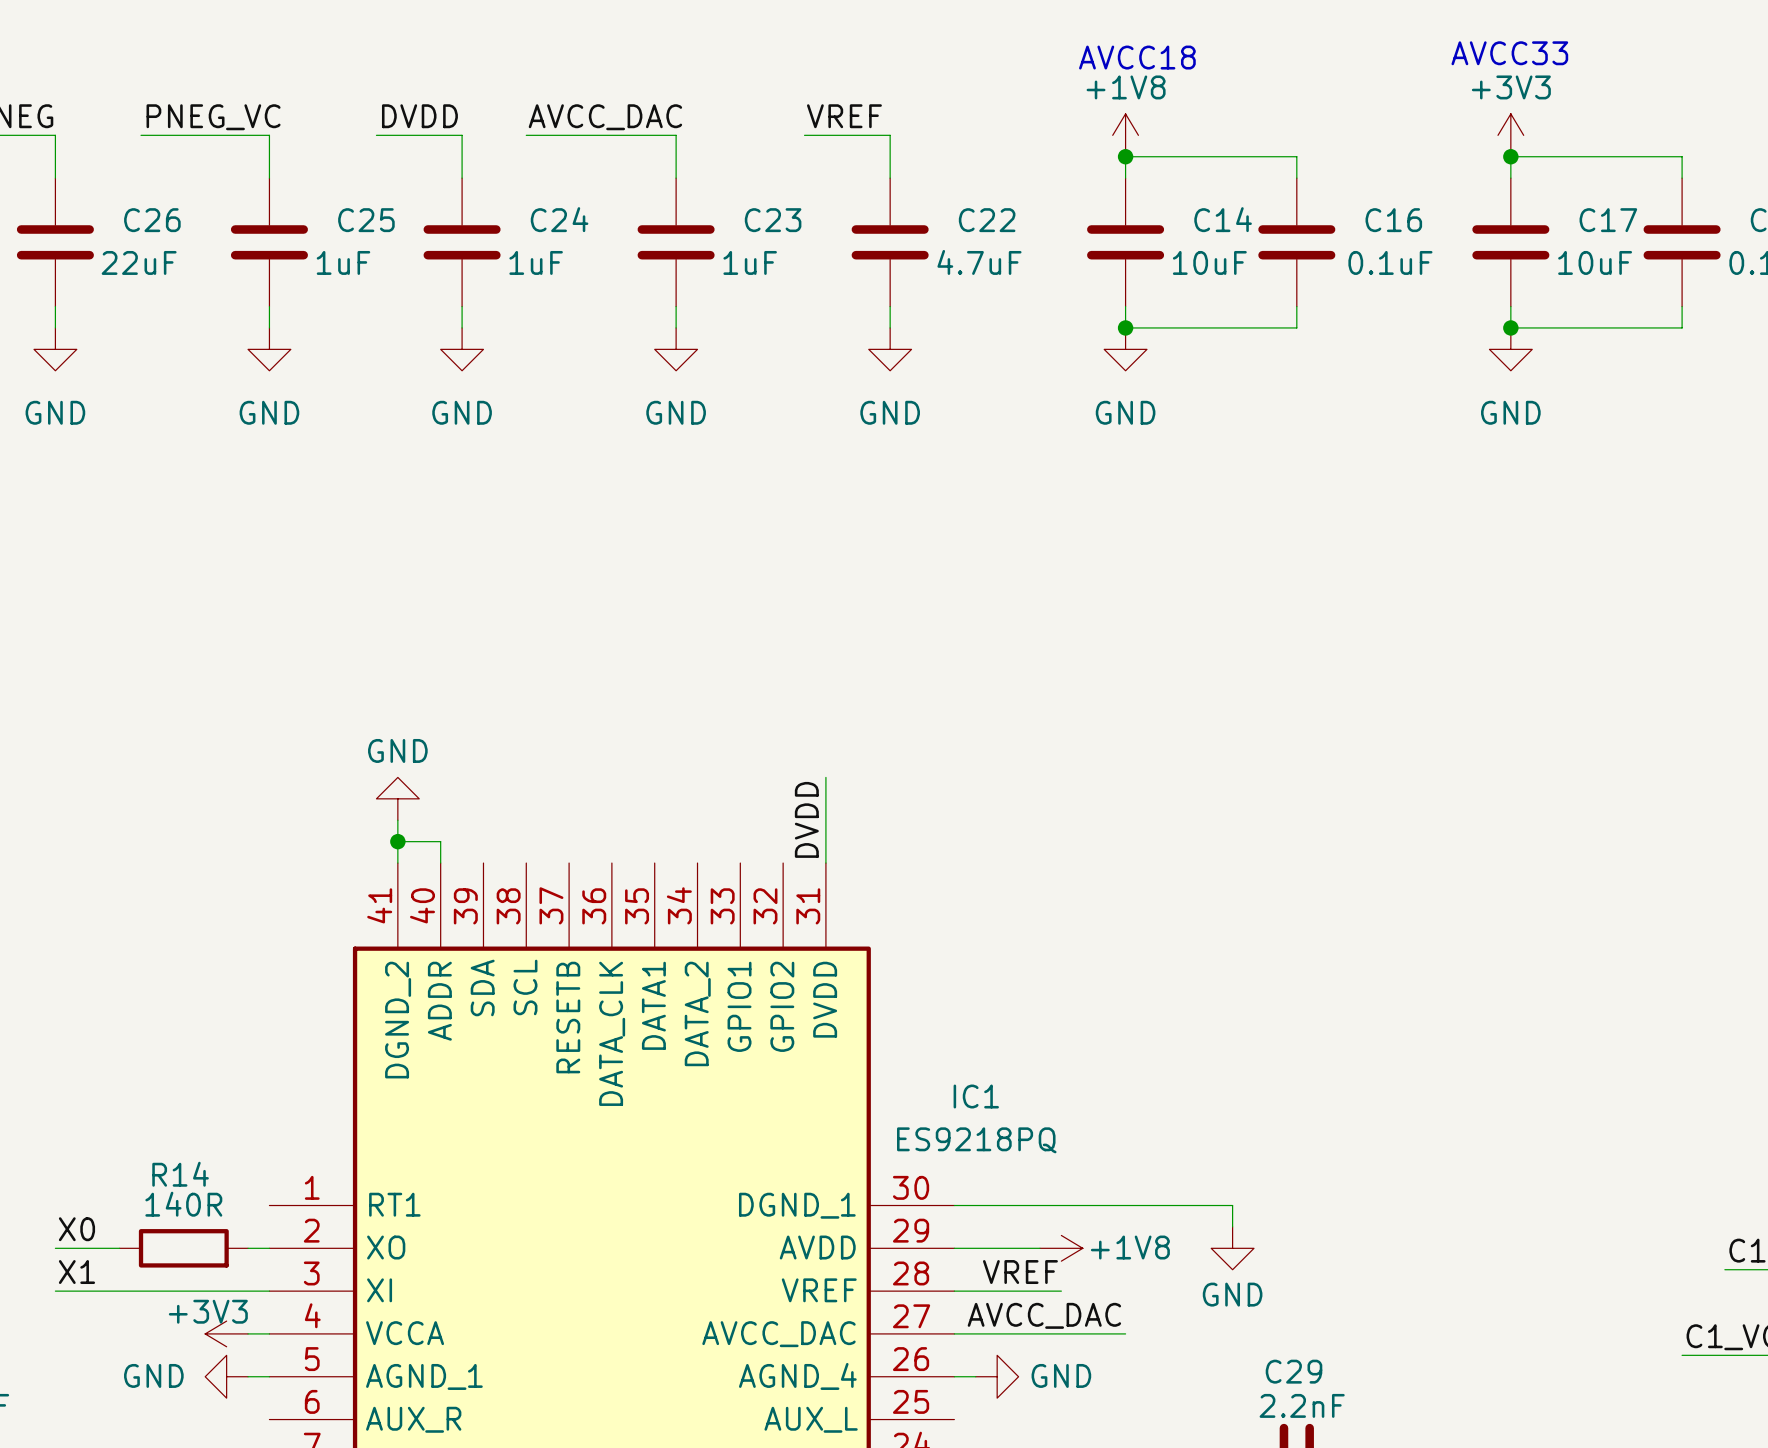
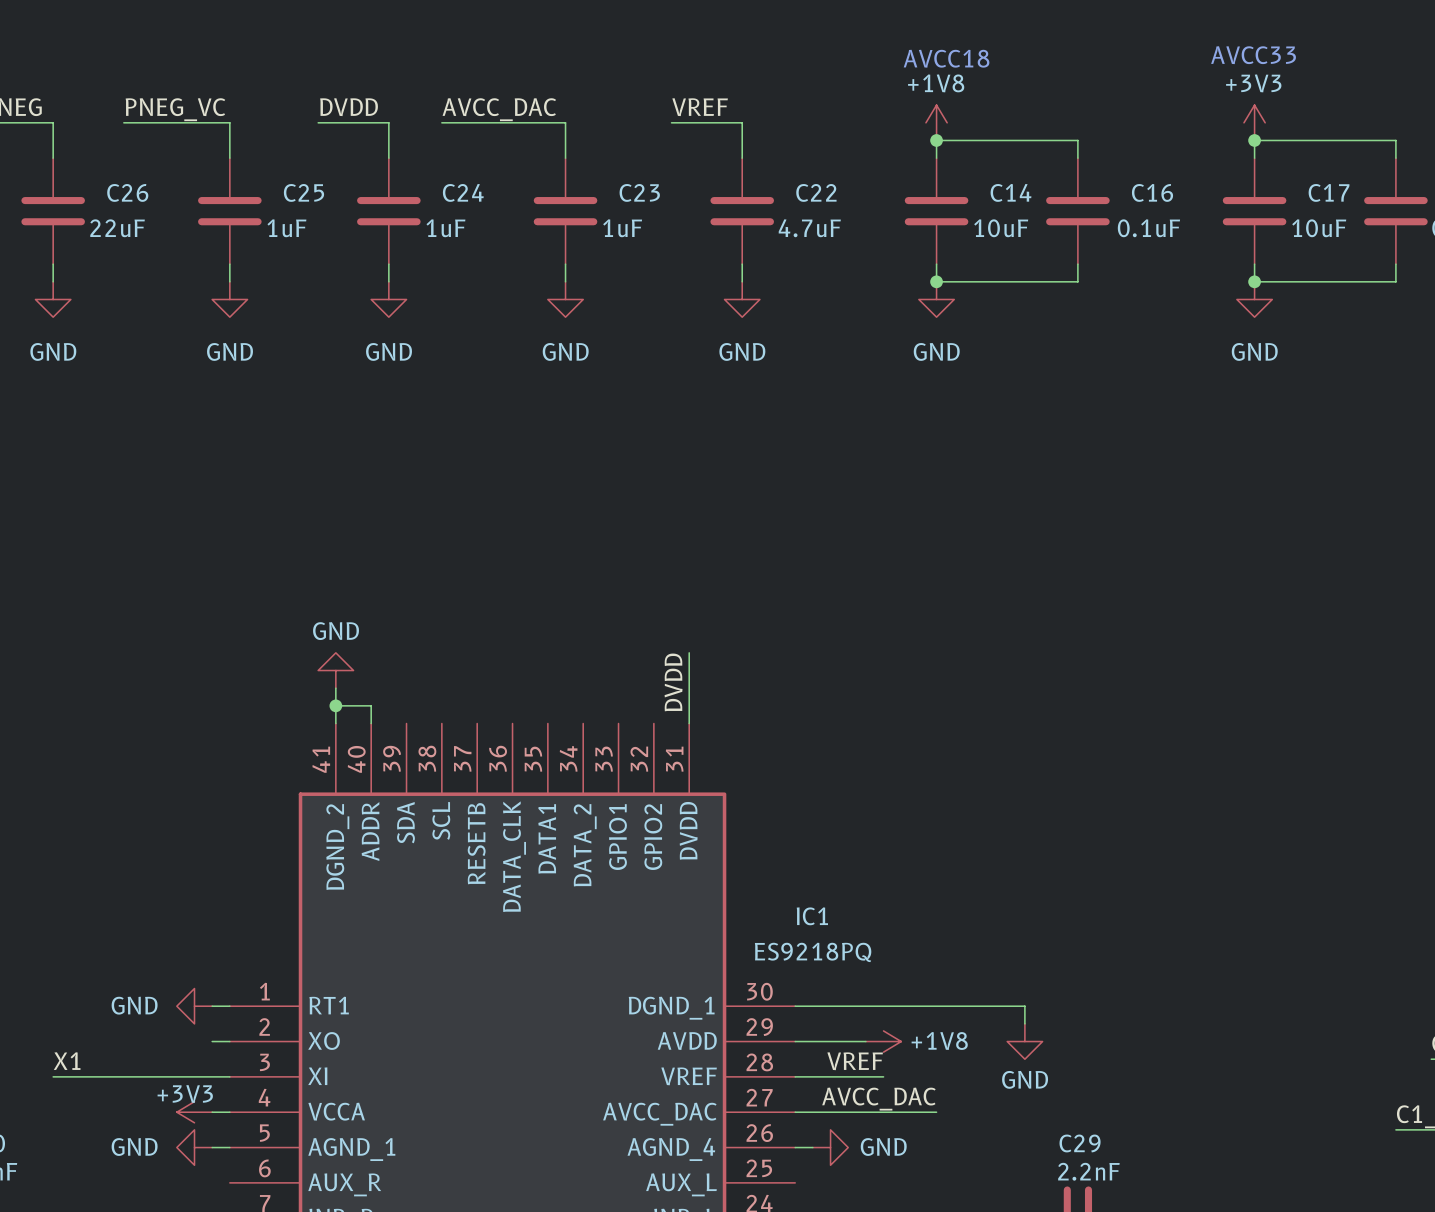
power symbol: none -> GND (194, 1006)
wire: none -> (212, 1006) (229, 1006)
label: X0 (76, 1229) -> none
wire: (55, 1248) (119, 1248) -> none
R14: 140R (183, 1248) -> none

